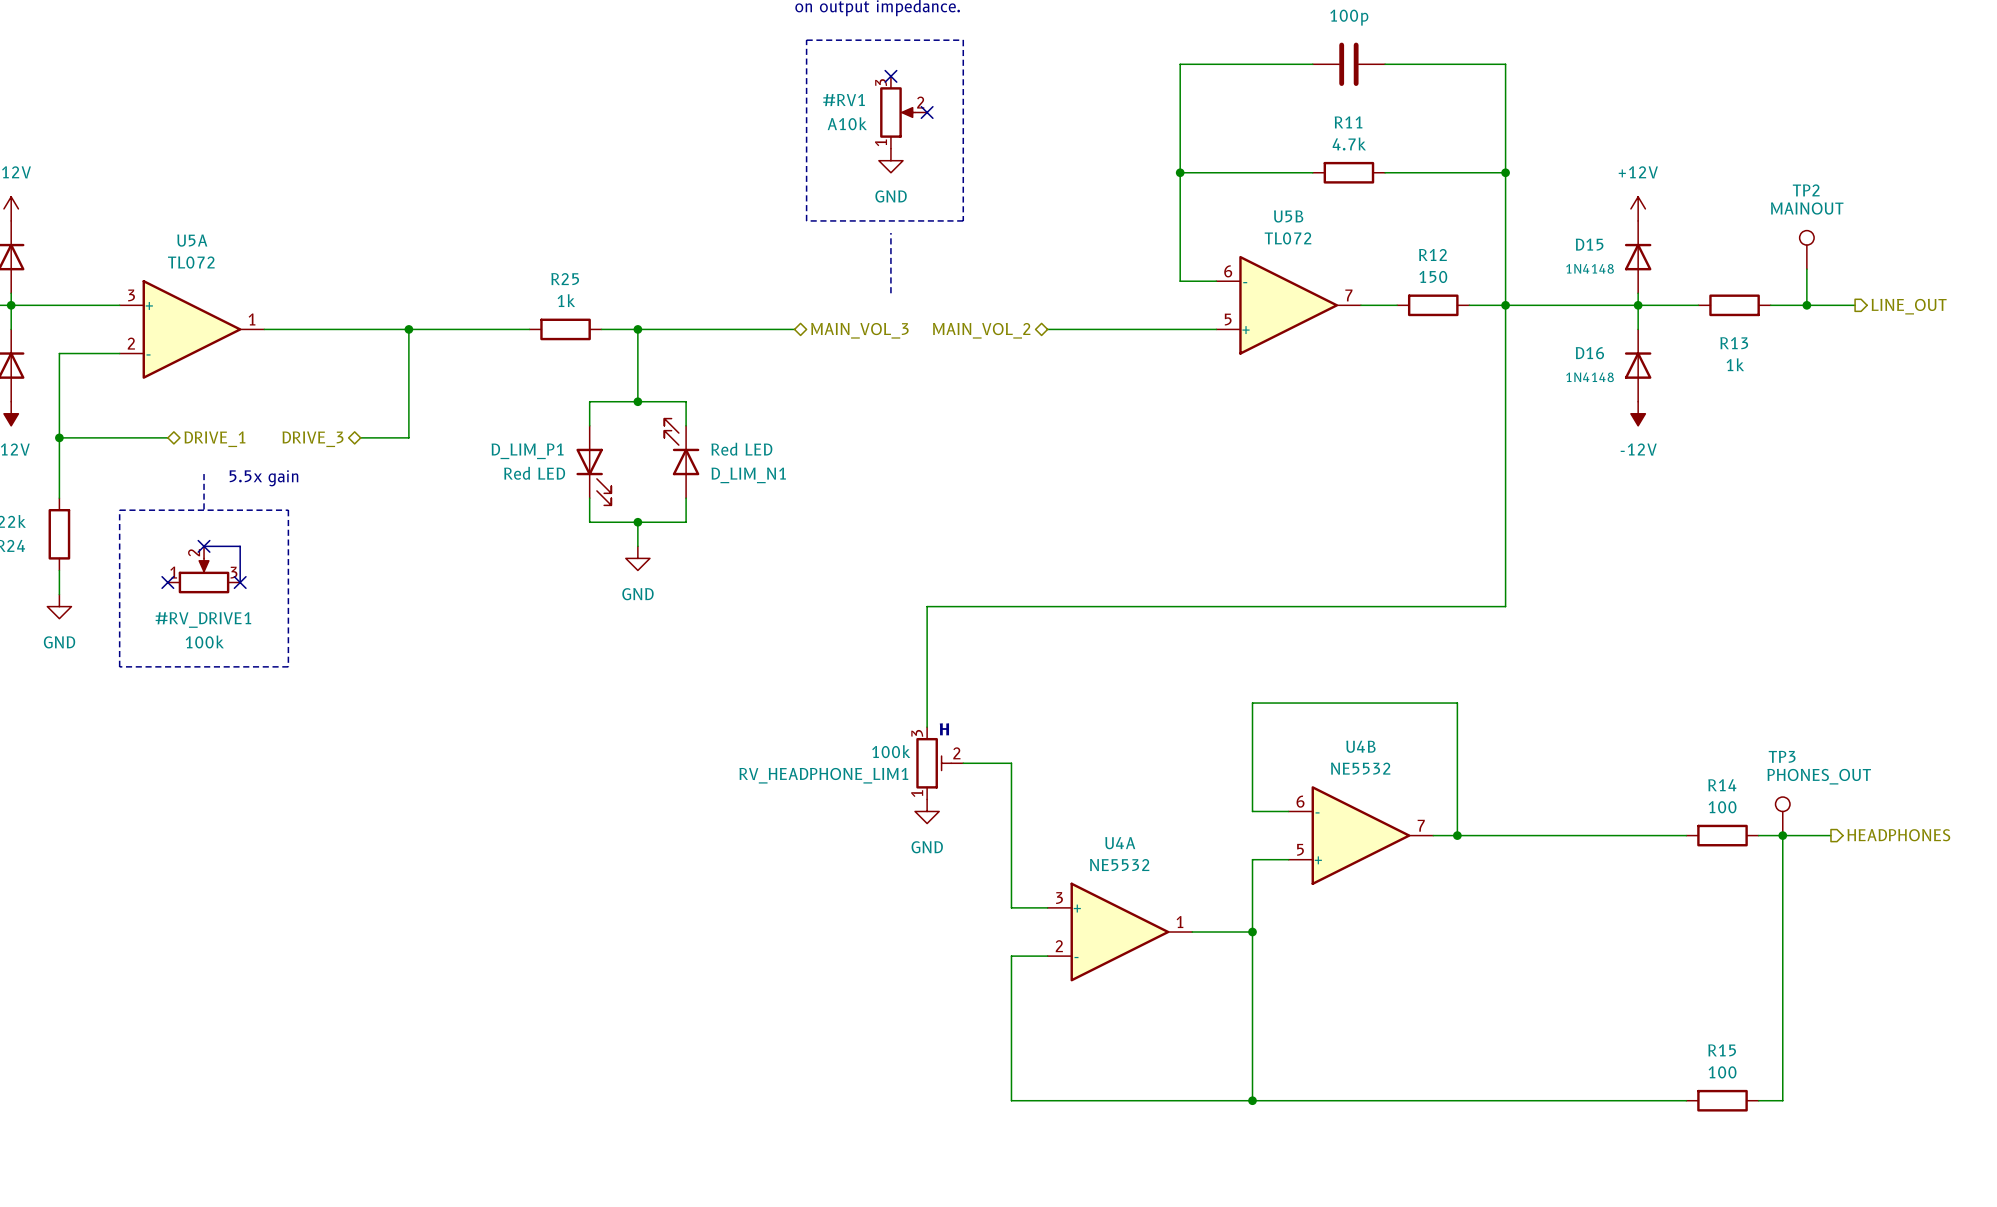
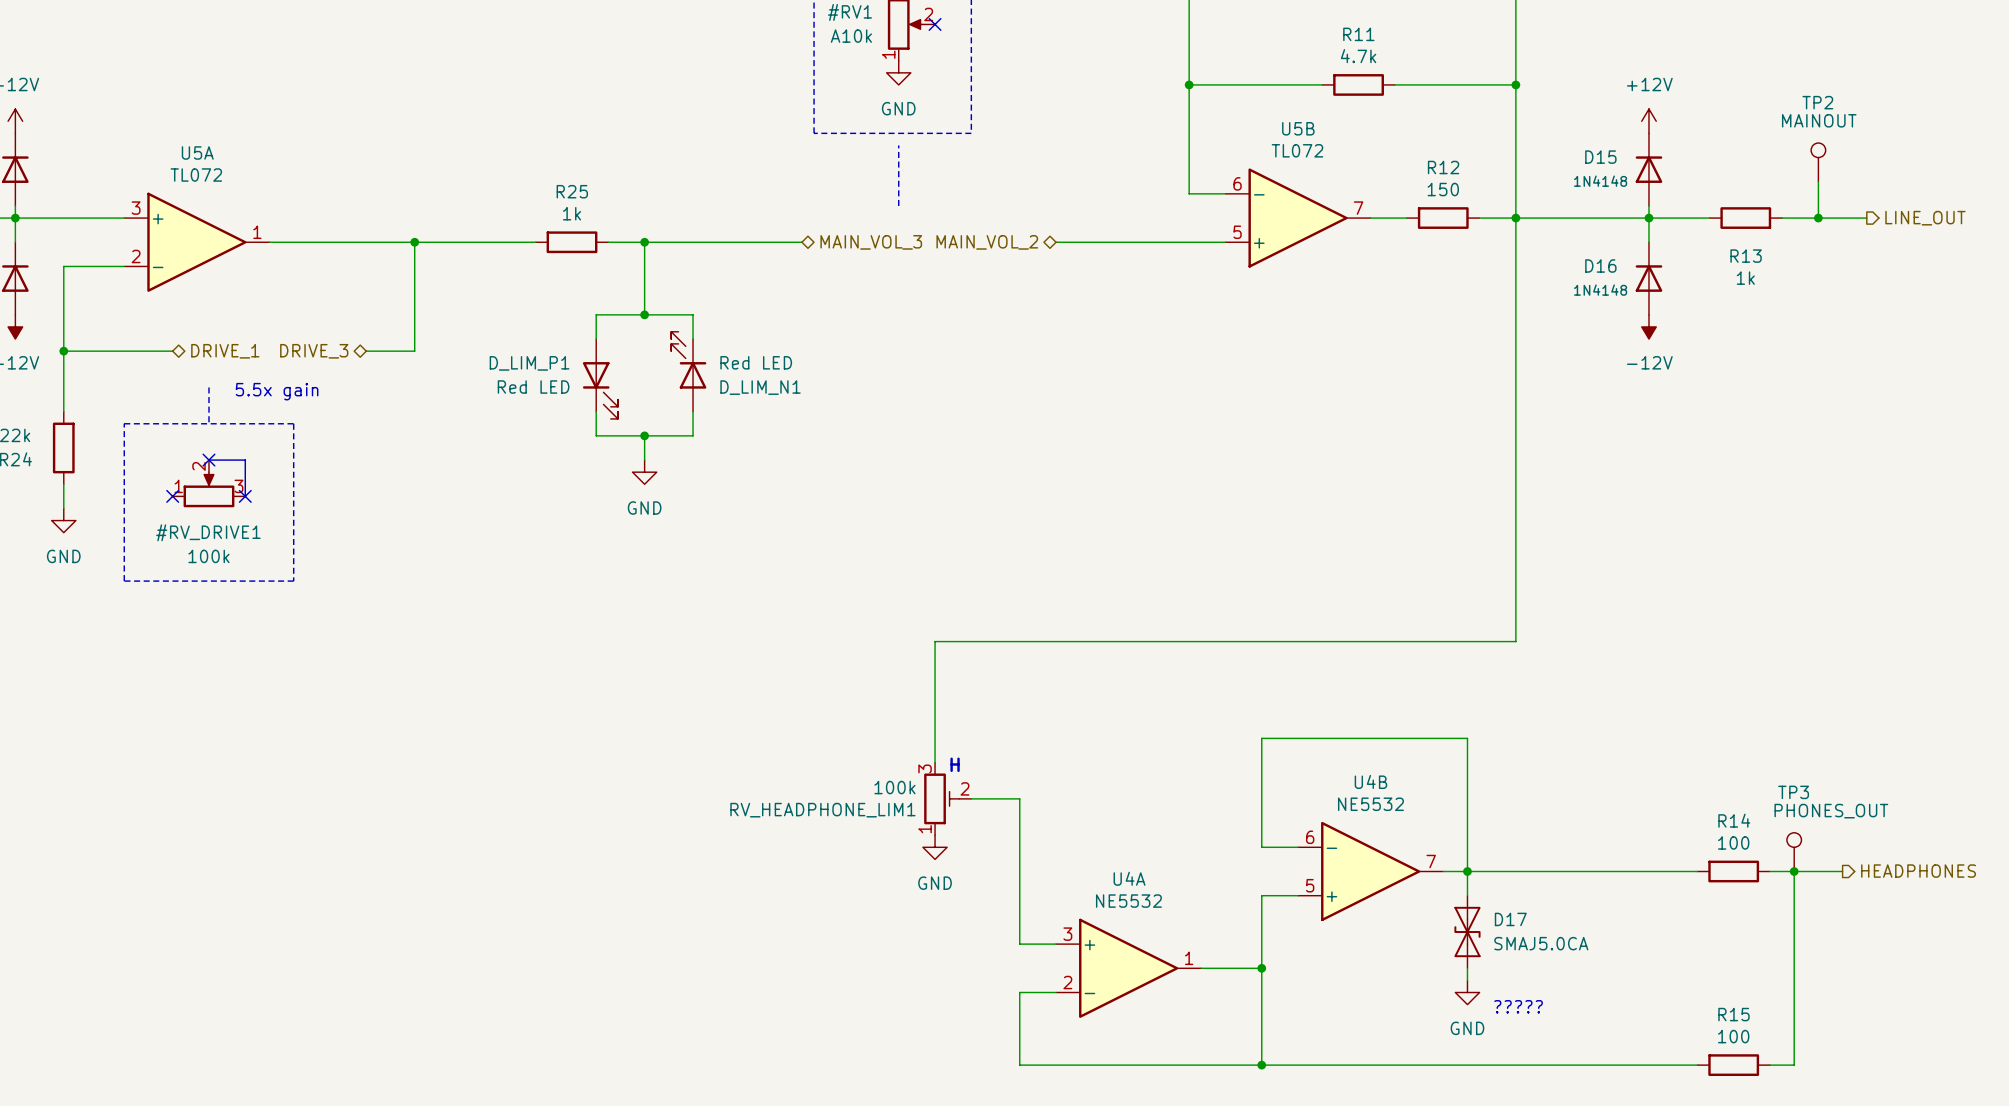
wire: (1505, 606) (927, 606) (927, 727) -> (1515, 520) (1515, 641) (935, 641) (935, 762)
text position: H (944, 729) -> H (955, 764)
RV_HEADPHONE_LIM1 position: (939, 763) -> (947, 798)
wire: (963, 763) (1011, 763) (1011, 883) -> (971, 798) (1019, 798)
power symbol position: GND (927, 811) -> GND (935, 847)
wire: (1288, 811) (1252, 811) (1252, 703) (1457, 703) (1457, 823) -> (1261, 774) (1261, 738) (1467, 738)
TP3 position: (1782, 816) -> (1794, 852)
U4B position: (1360, 835) -> (1370, 871)
wire: (1433, 835) (1686, 835) -> (1443, 871) (1697, 871)
wire: none -> (1467, 750) (1467, 895)
junction: (1457, 835) -> none
R14 position: (1722, 835) -> (1733, 871)
wire: (1758, 835) (1830, 835) -> (1769, 871) (1842, 871)
wire: (1782, 835) (1782, 956) -> none
junction: (1782, 835) -> none
hierarchical label position: HEADPHONES (1898, 835) -> HEADPHONES (1918, 871)
wire: (1252, 859) (1288, 859) -> (1261, 847) (1298, 847)
wire: (1011, 907) (1047, 907) -> (1019, 823) (1019, 871)
U4A position: (1119, 932) -> (1128, 968)
wire: (1192, 932) (1252, 932) (1252, 980) -> (1298, 895) (1261, 895)
junction: (1252, 932) -> none
wire: (1011, 956) (1047, 956) -> (1019, 992) (1056, 992)
junction: none -> (1467, 871)
junction: none -> (1794, 871)
D17: none -> SMAJ5.0CA (1467, 932)
wire: (1011, 1028) (1011, 1076) -> (1019, 944) (1056, 944)
wire: none -> (1201, 968) (1261, 968)
junction: none -> (1261, 968)
wire: none -> (1467, 968) (1467, 980)
power symbol: none -> GND (1467, 992)
text: none -> ????? (1518, 1006)
wire: (1011, 1100) (1686, 1100) -> (1019, 1016) (1019, 1065) (1697, 1065)
wire: none -> (1261, 1016) (1261, 1065)
junction: (1252, 1100) -> none
R15 position: (1722, 1100) -> (1733, 1065)
wire: (1758, 1100) (1782, 1100) -> (1769, 1065) (1794, 1065) (1794, 1016)
junction: none -> (1261, 1065)

